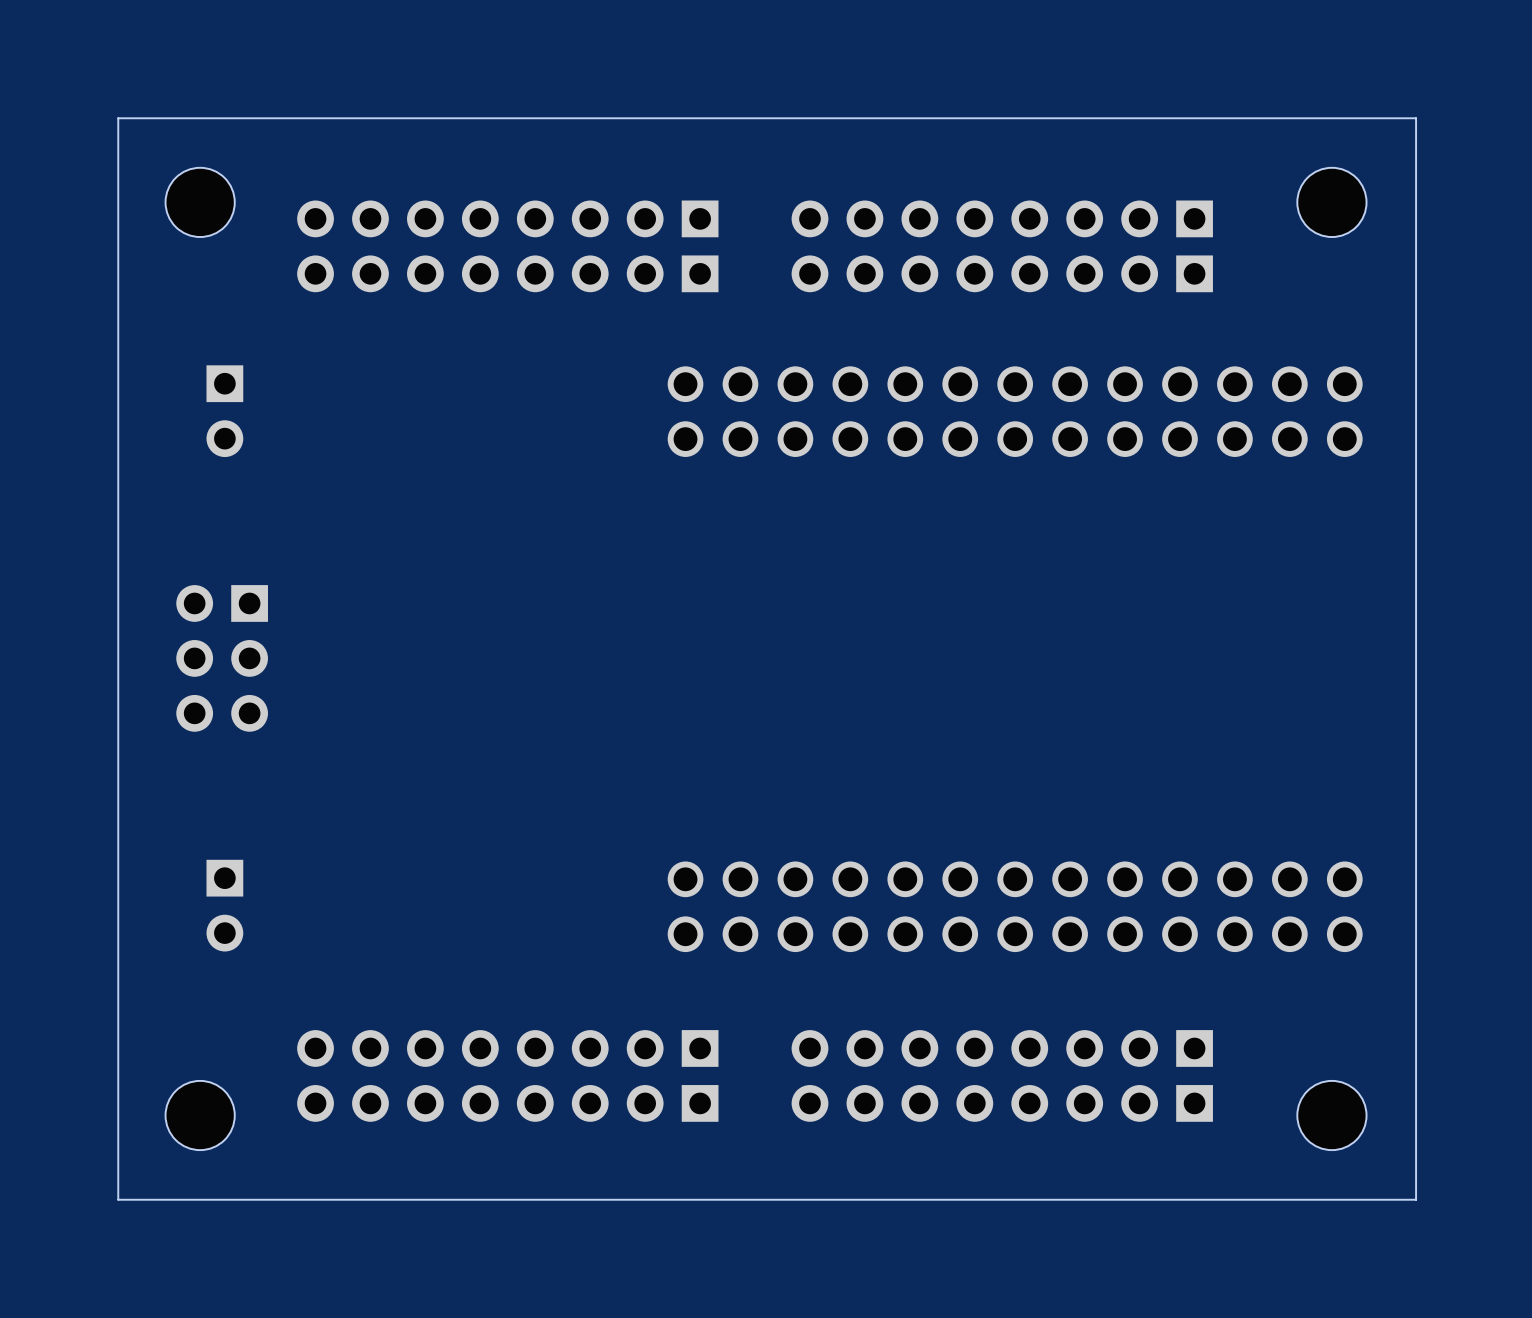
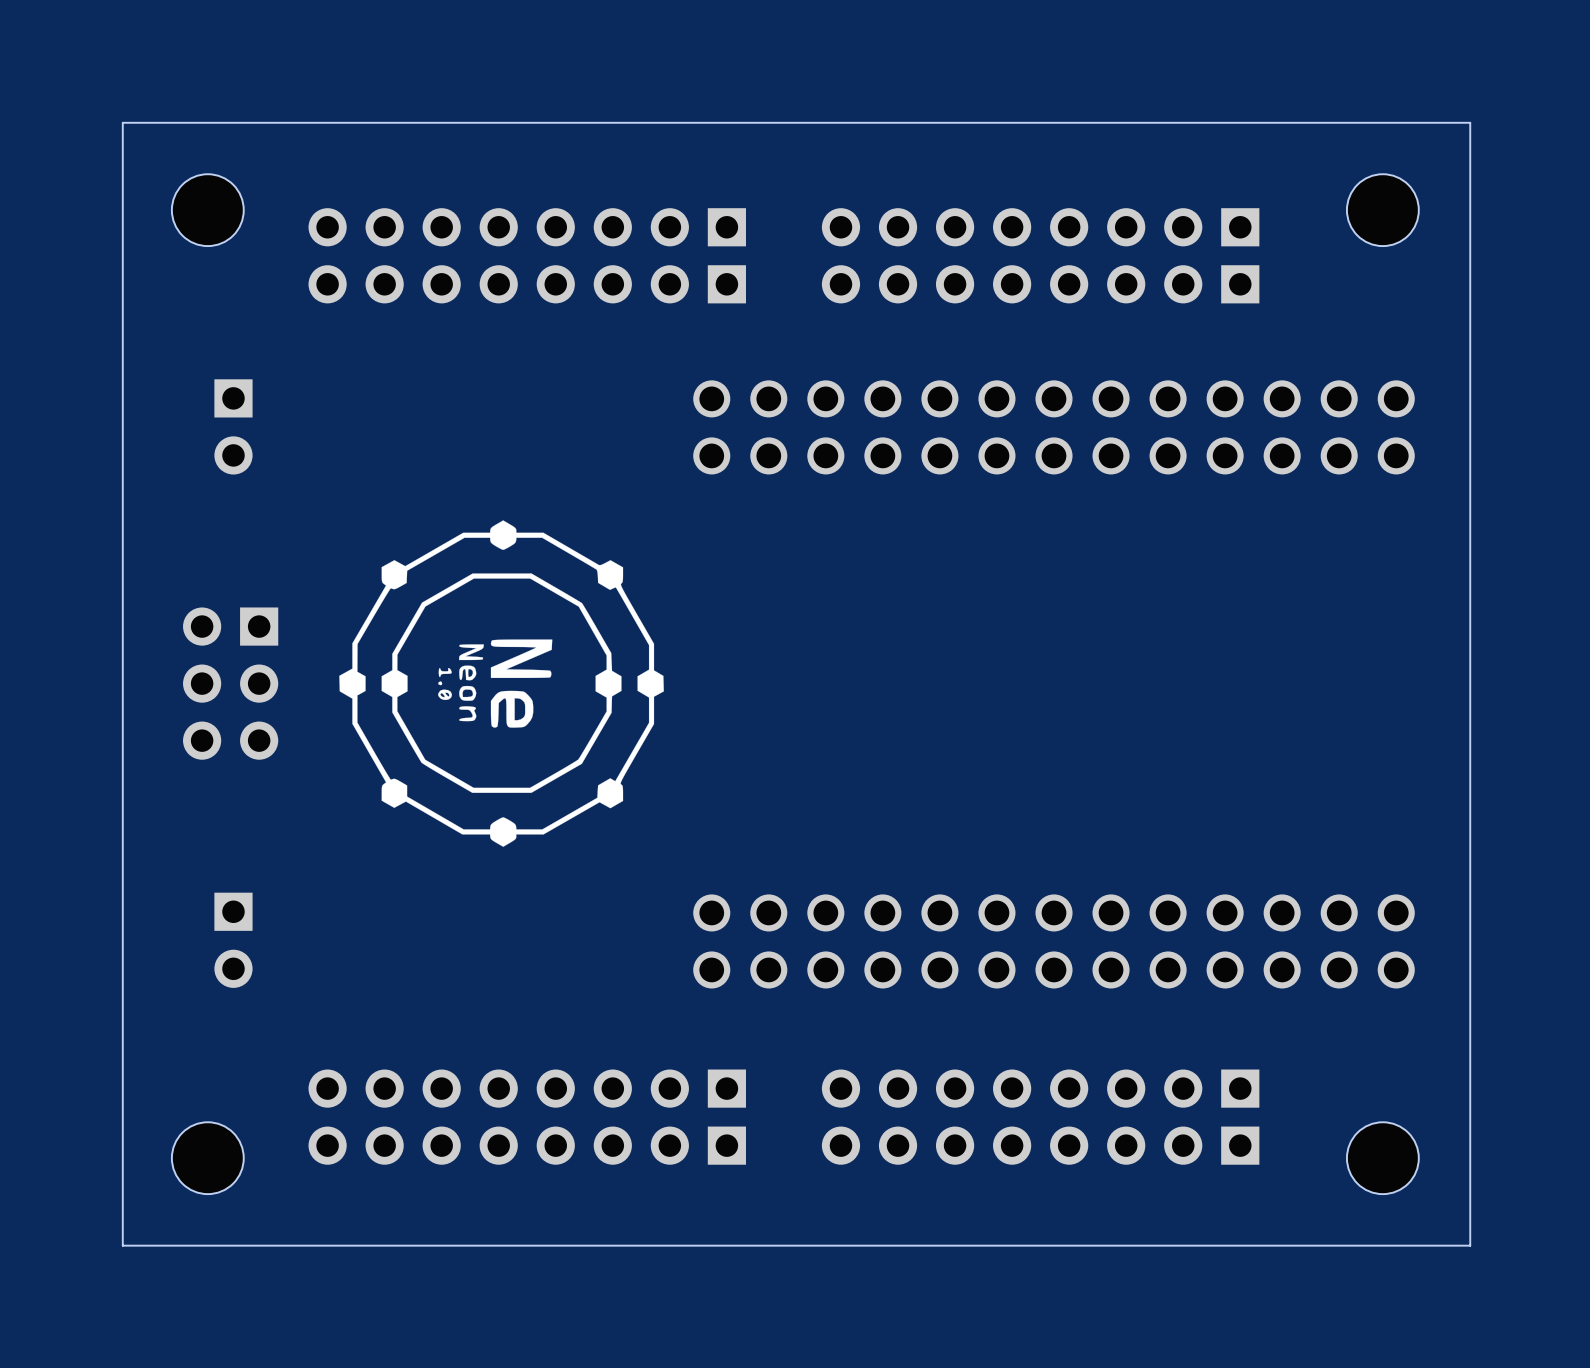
drawing: none -> [339, 520, 664, 847]

